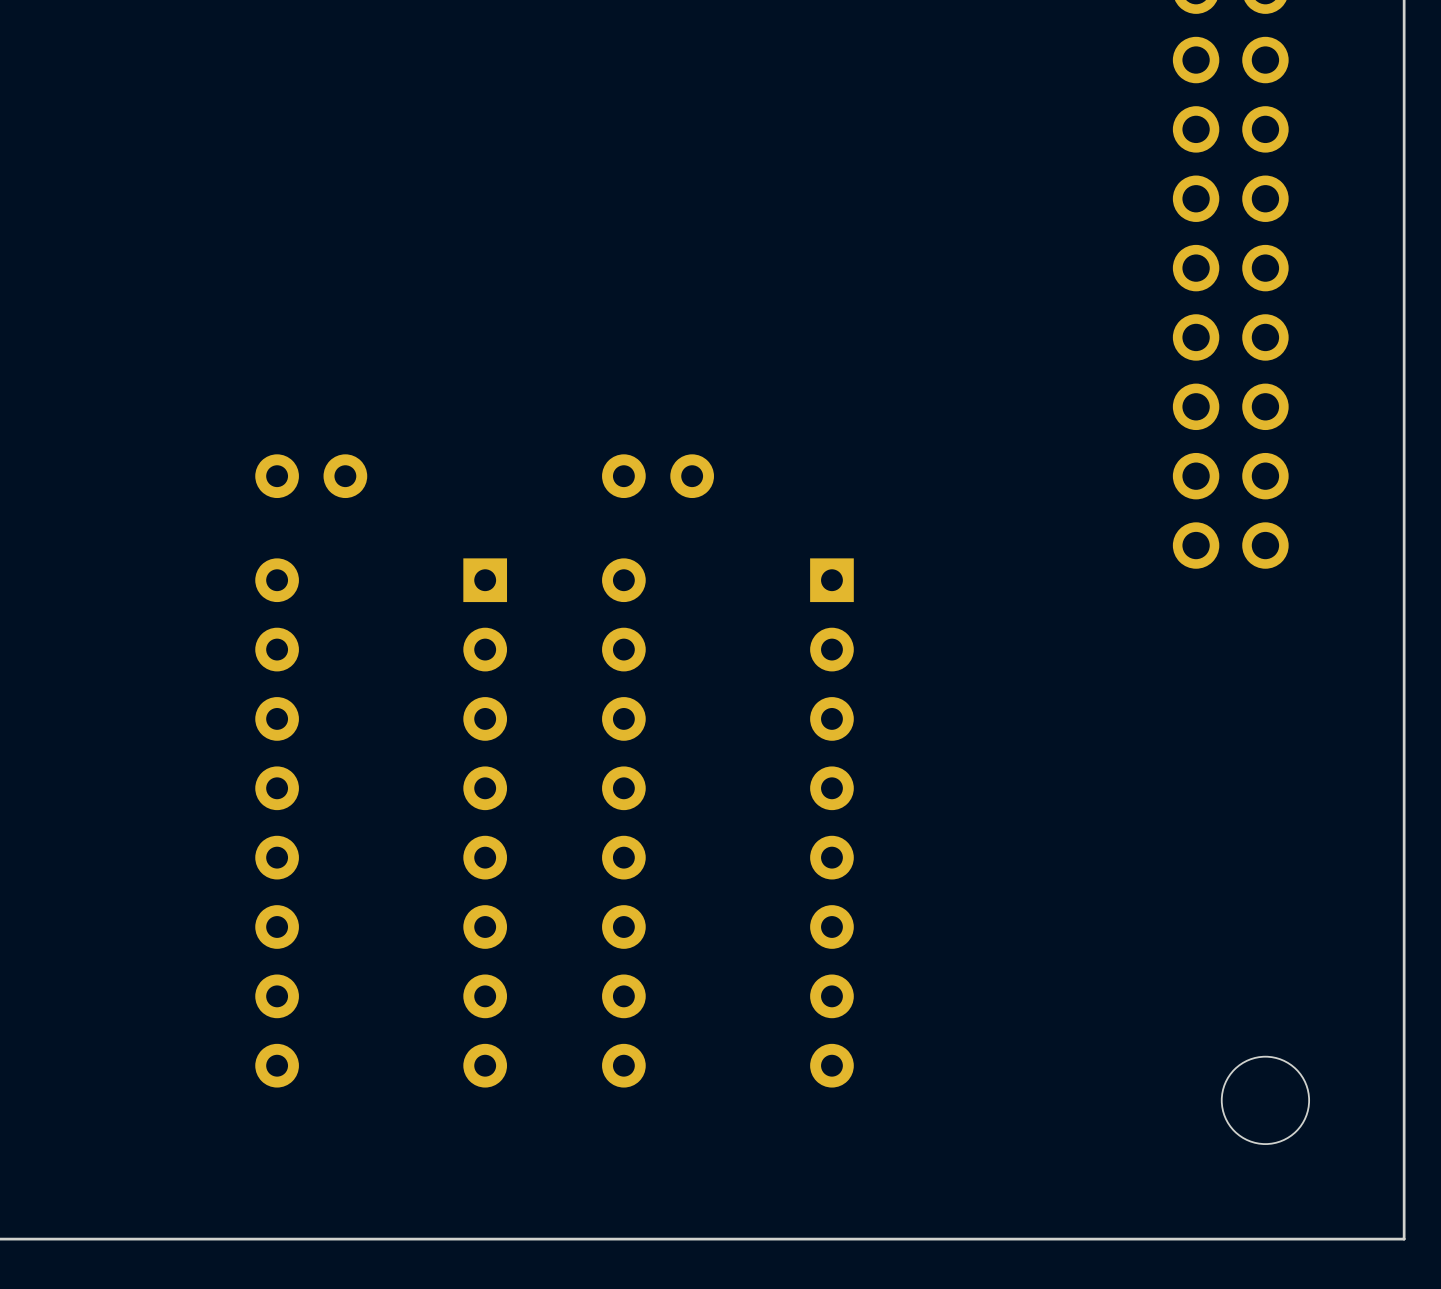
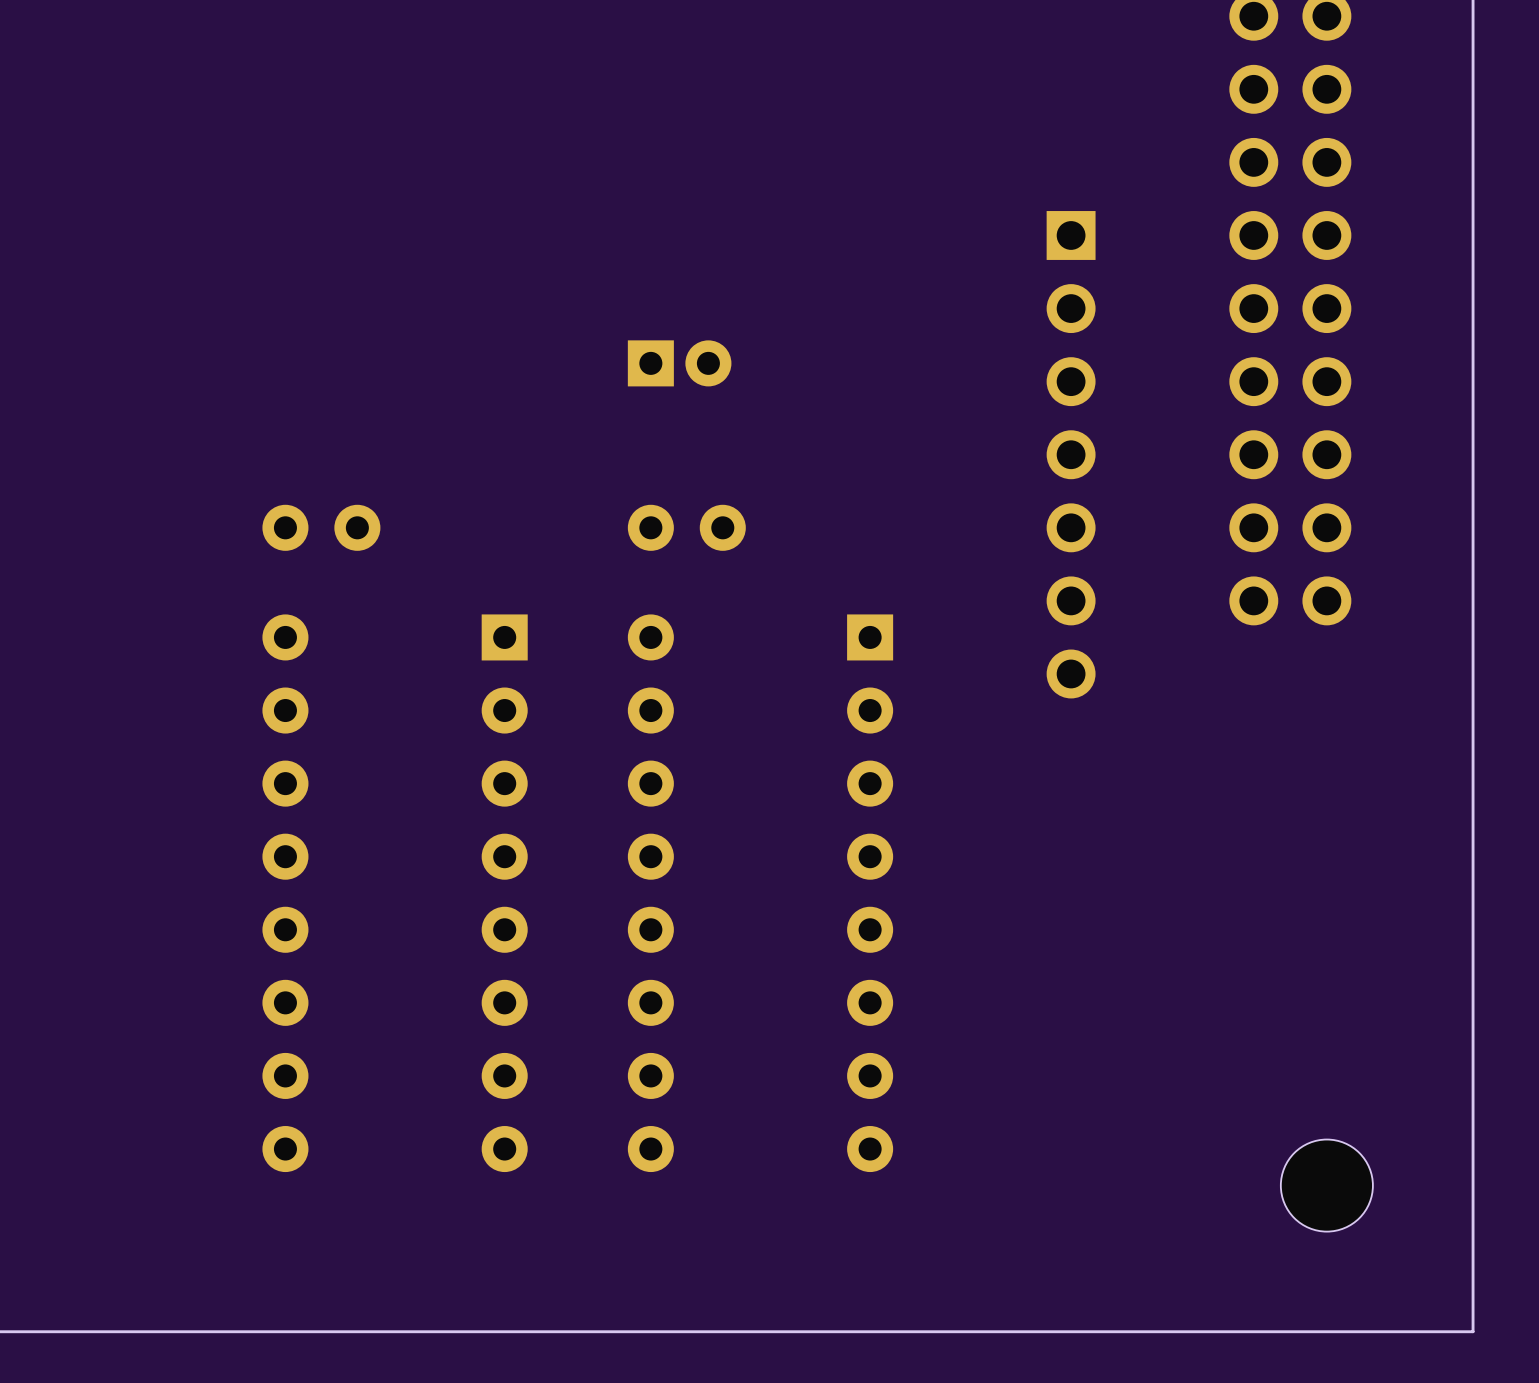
part: none -> (679, 363)
part: none -> (1071, 454)

